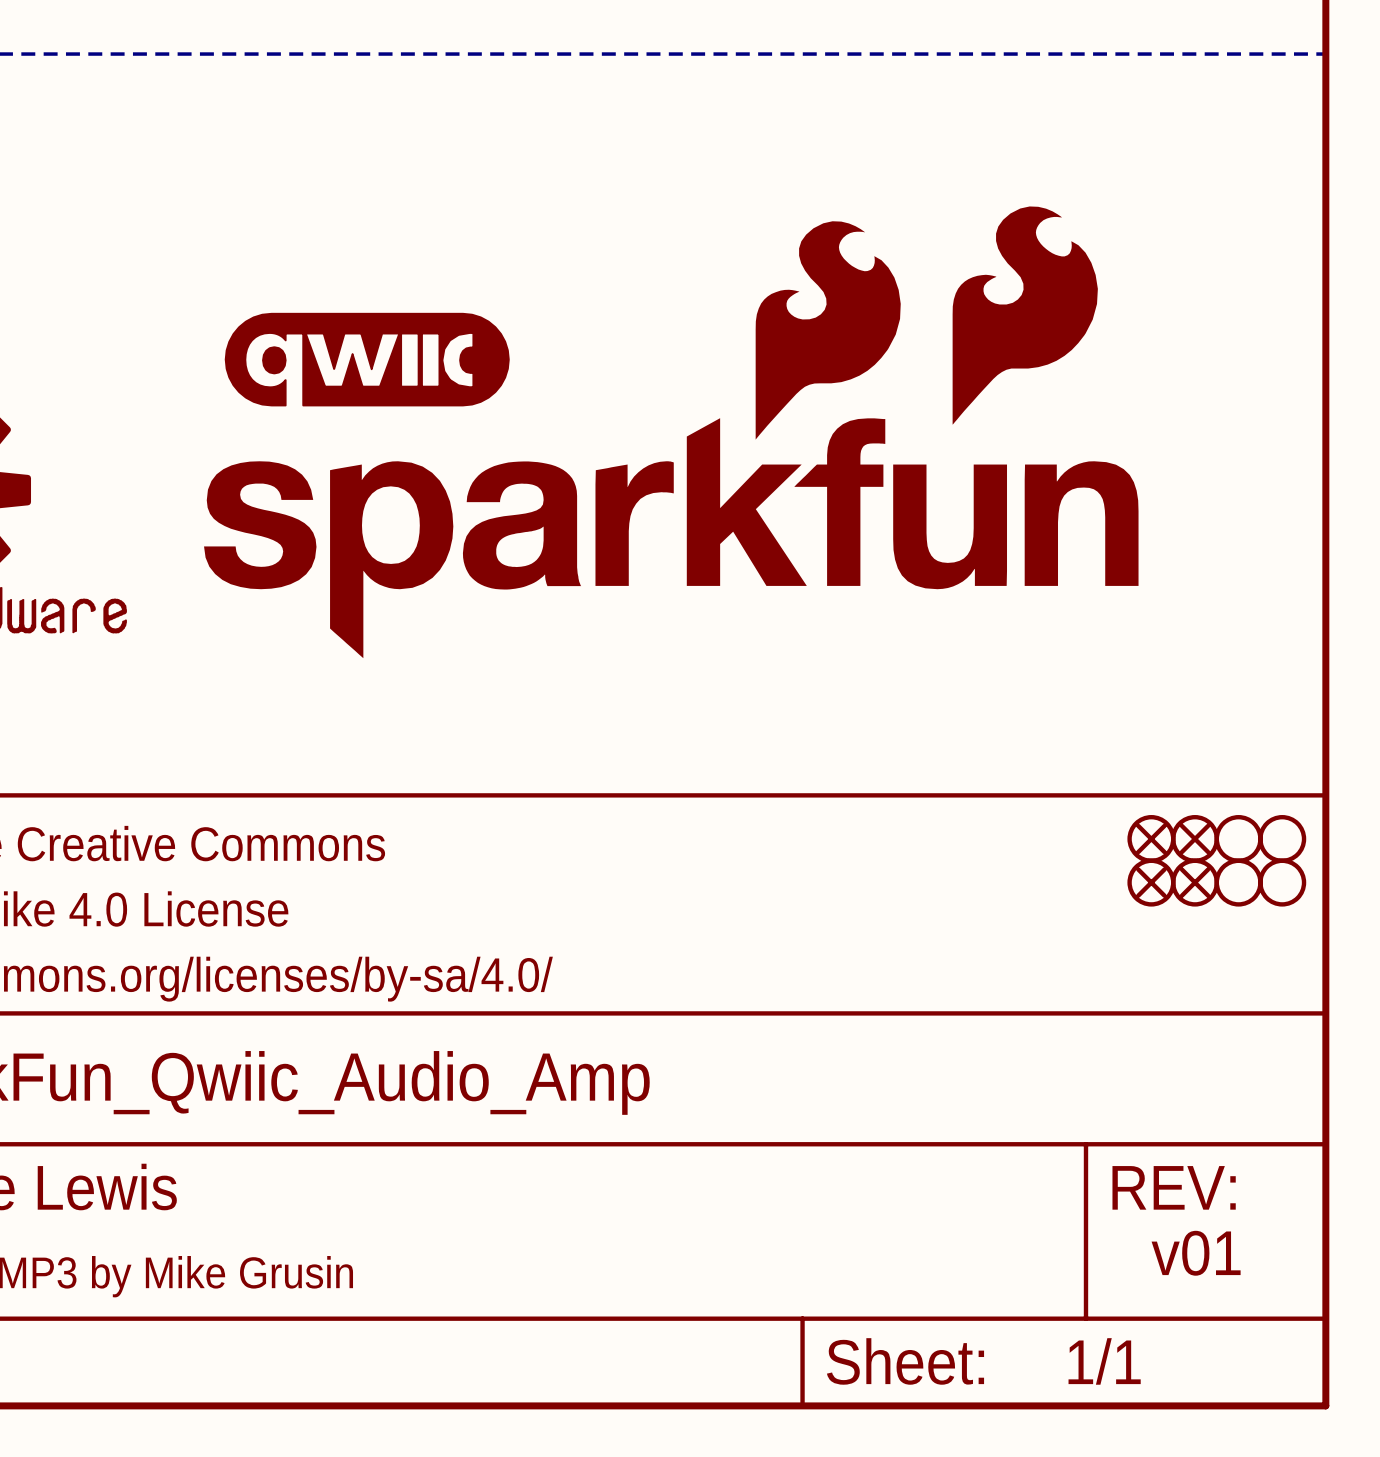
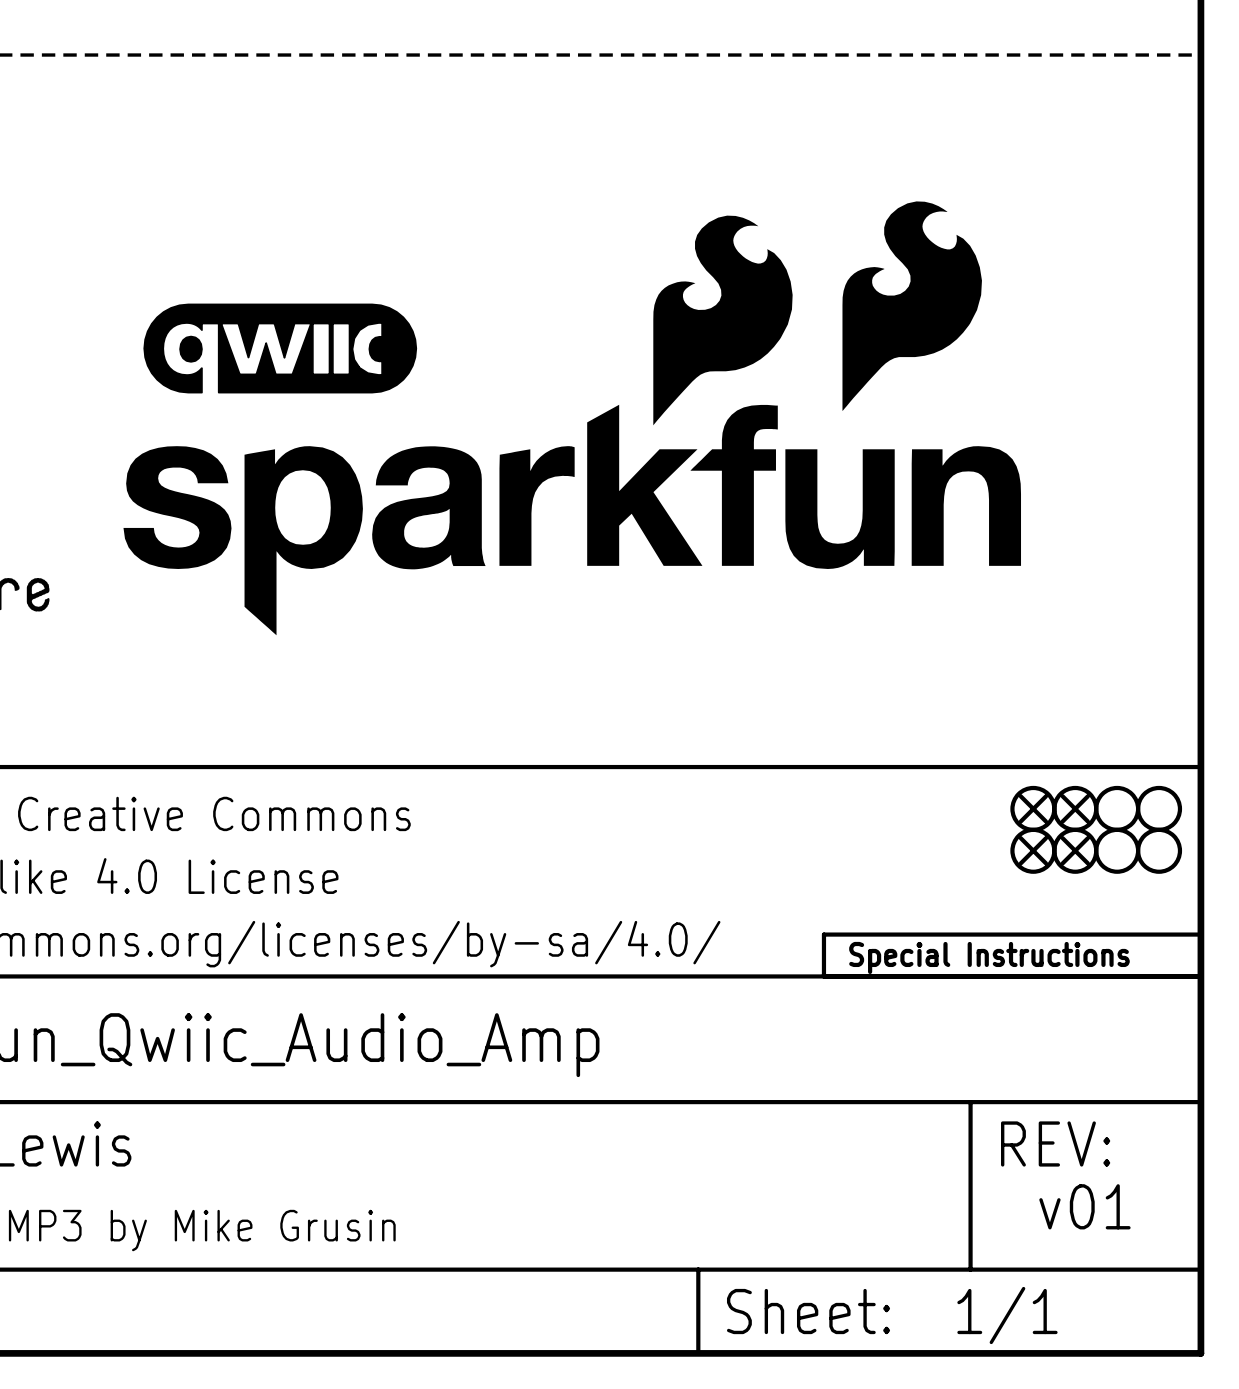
part: none -> (1012, 955)

